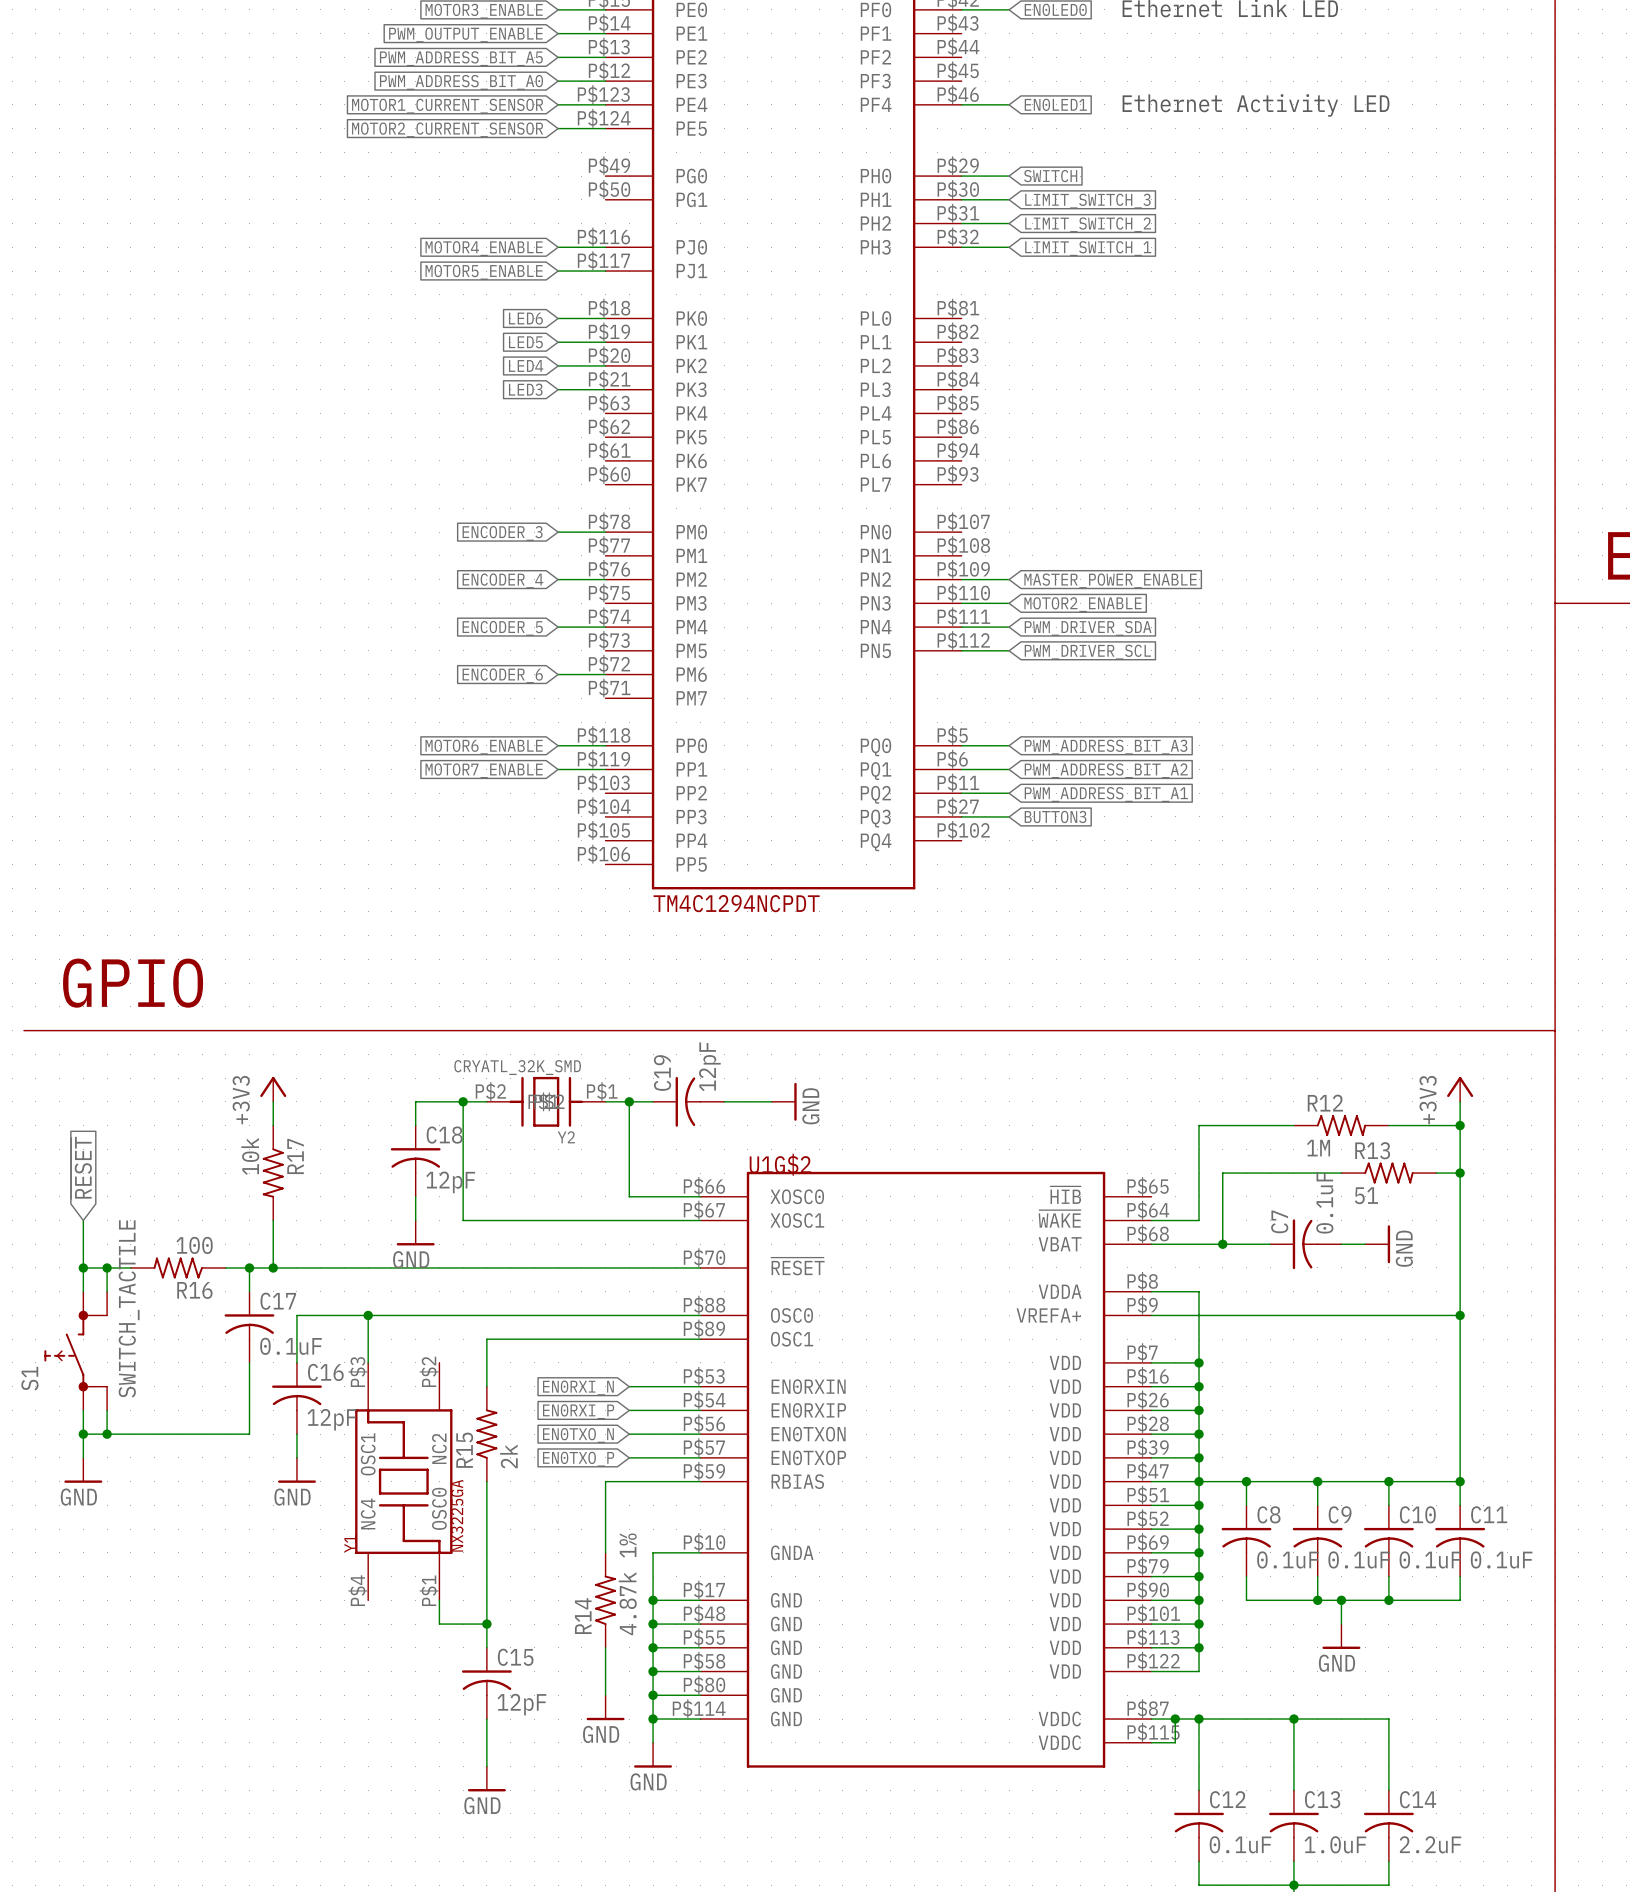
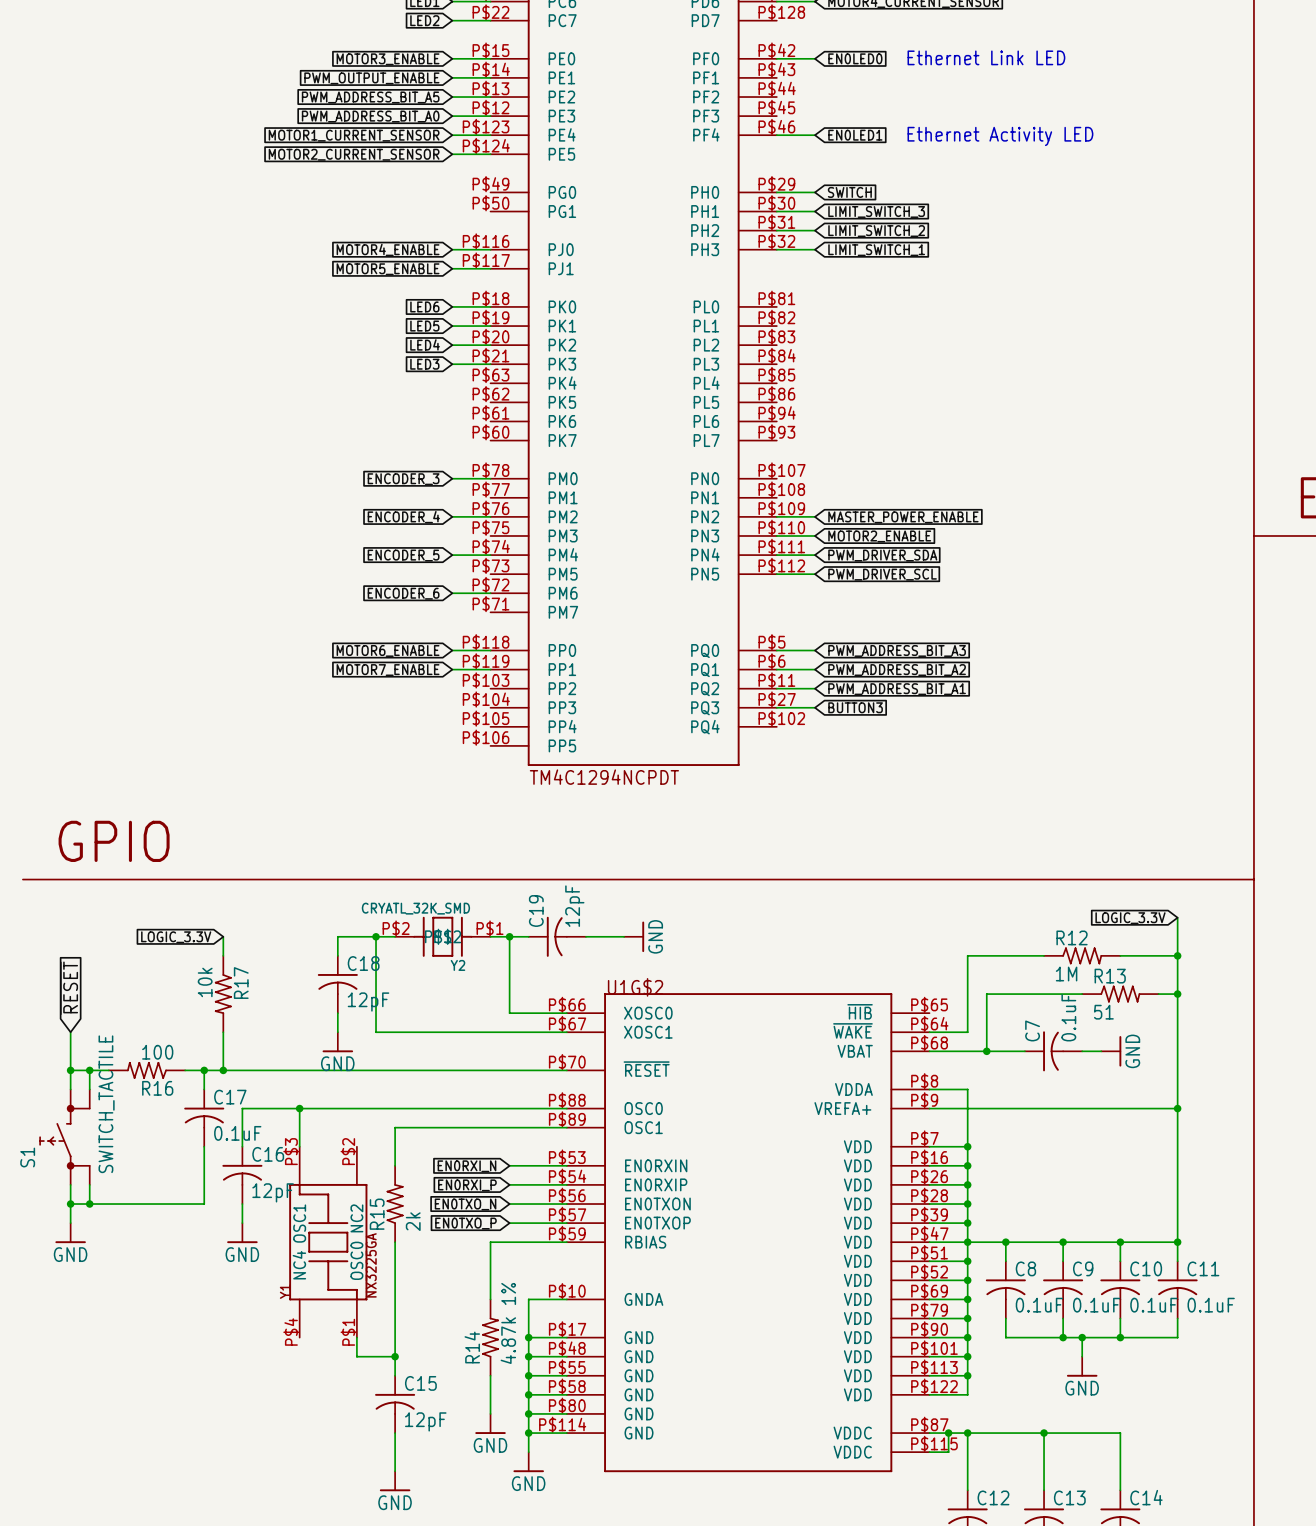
global label: none -> LOGIC_3.3V (1130, 918)
power symbol: +3V3 (273, 1089) -> none
power symbol: +3V3 (1460, 1089) -> none
global label: none -> LOGIC_3.3V (176, 937)

